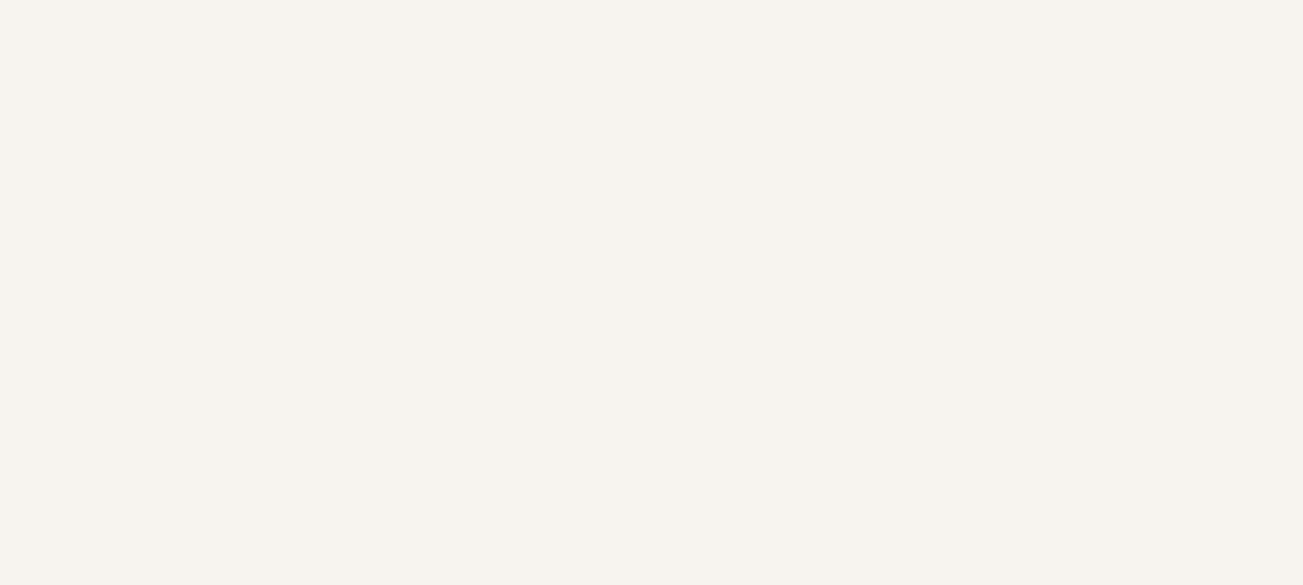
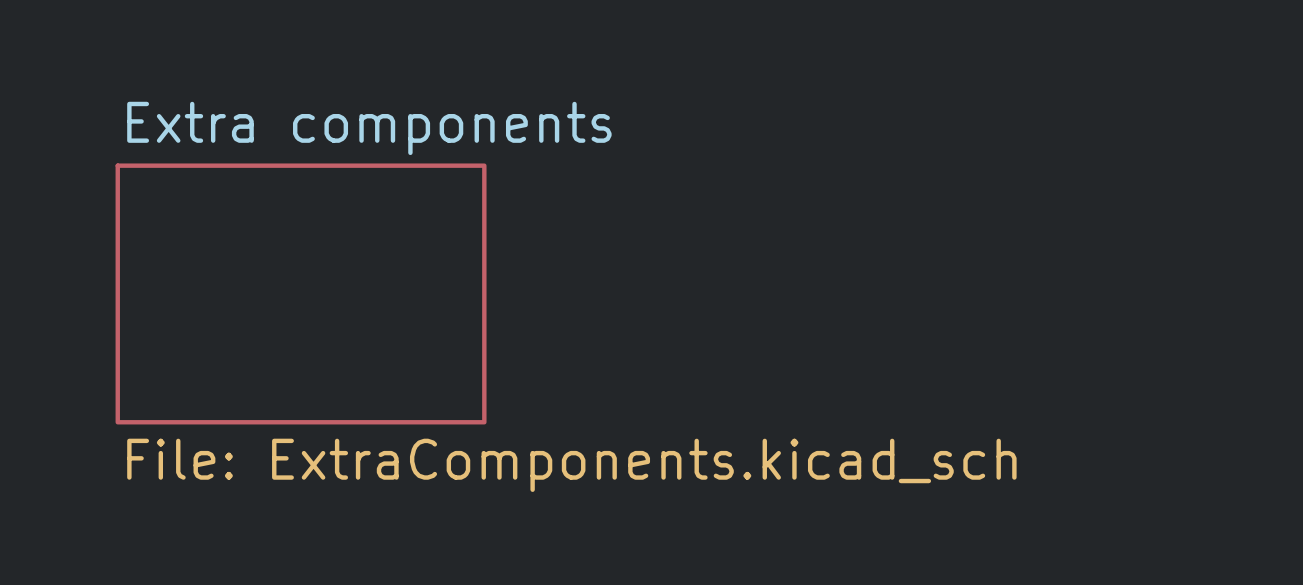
sheet Extra components: none -> File: ExtraComponents.kicad_sch (301, 293)

